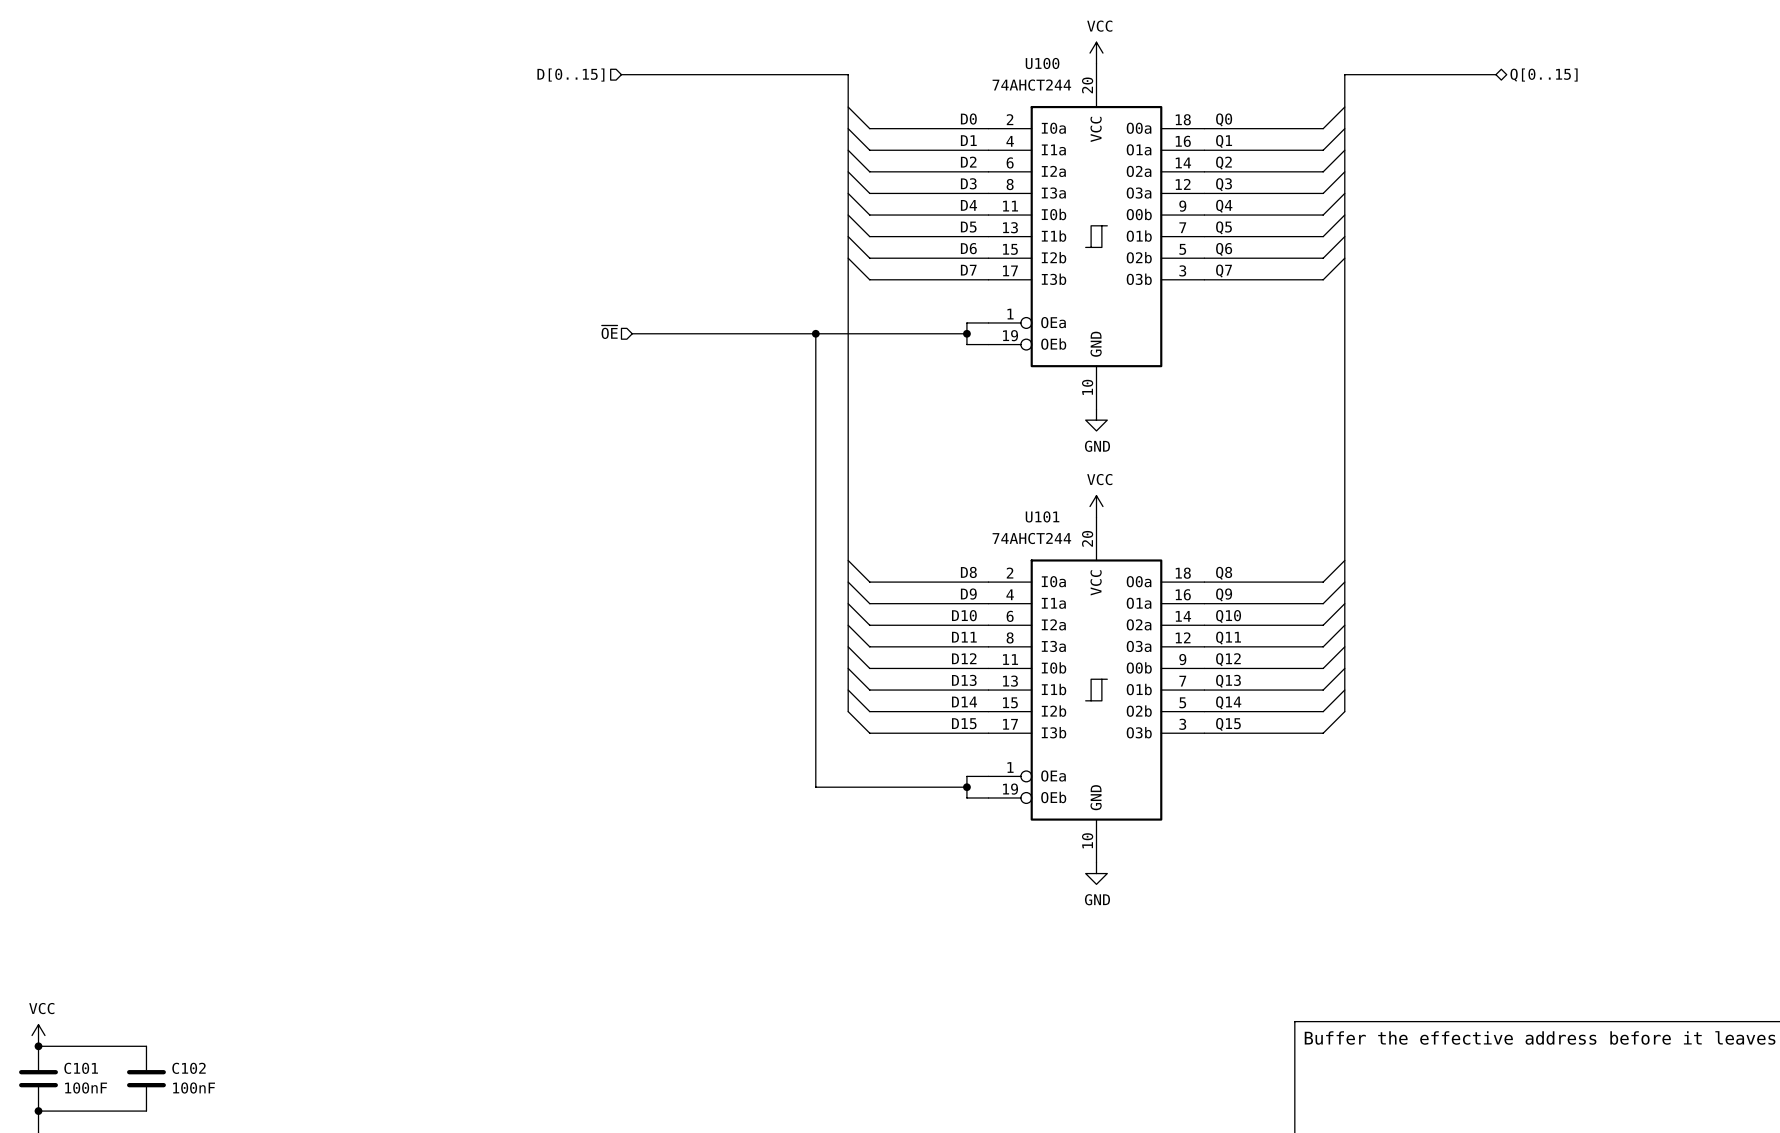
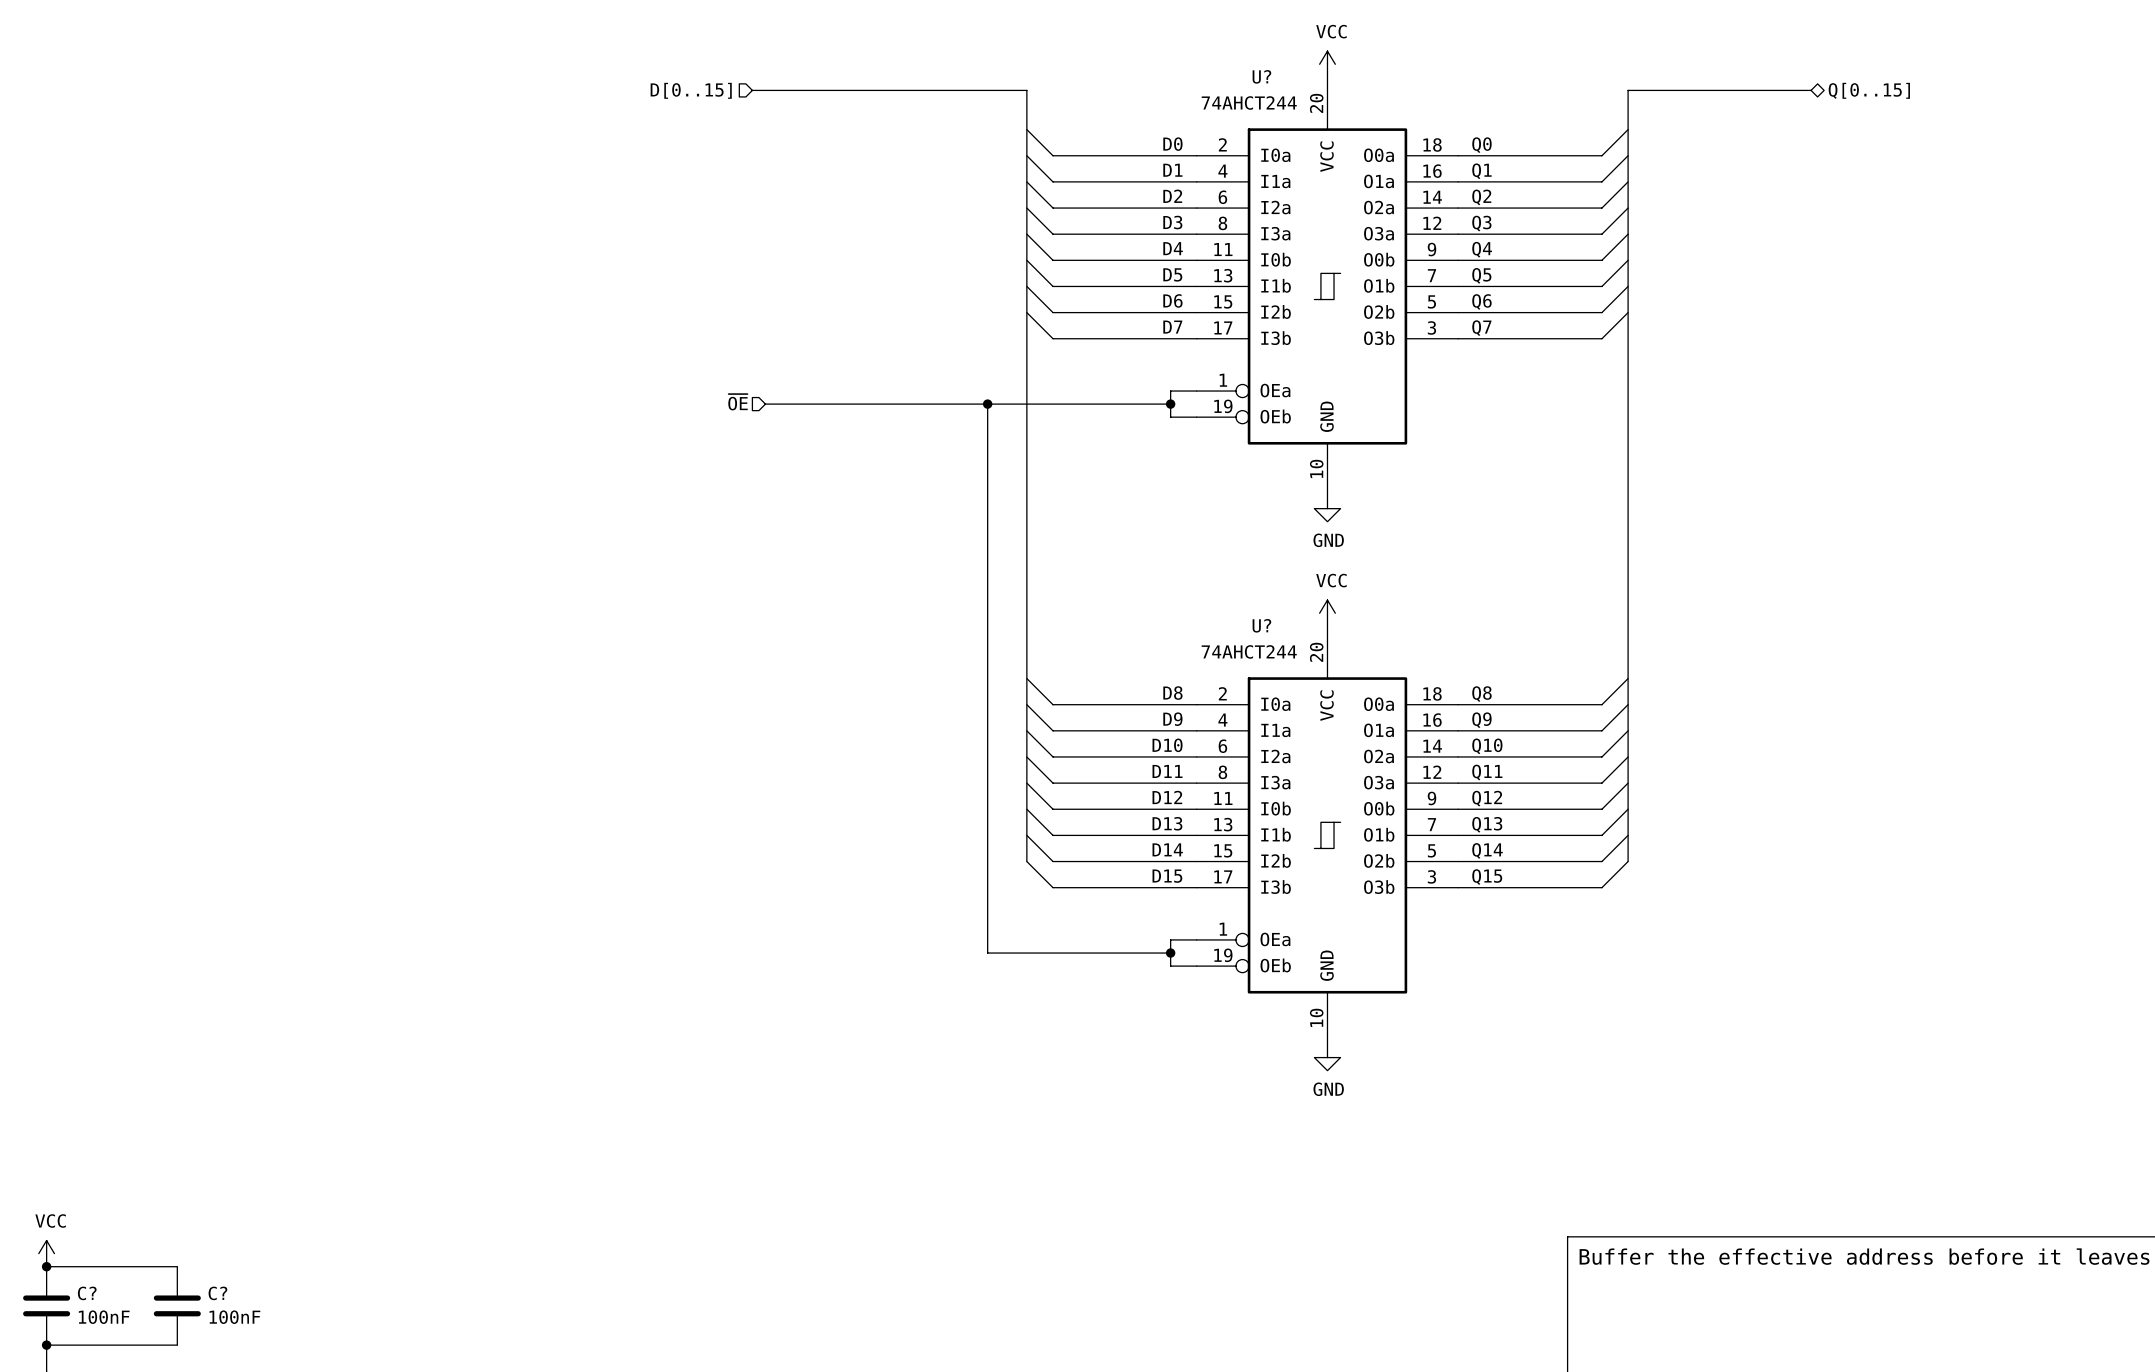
U100 name: U100 (1042, 63) -> U? (1261, 76)
U101 name: U101 (1042, 516) -> U? (1261, 625)
C101 name: C101 (81, 1068) -> C? (87, 1293)
C102 name: C102 (189, 1068) -> C? (217, 1293)

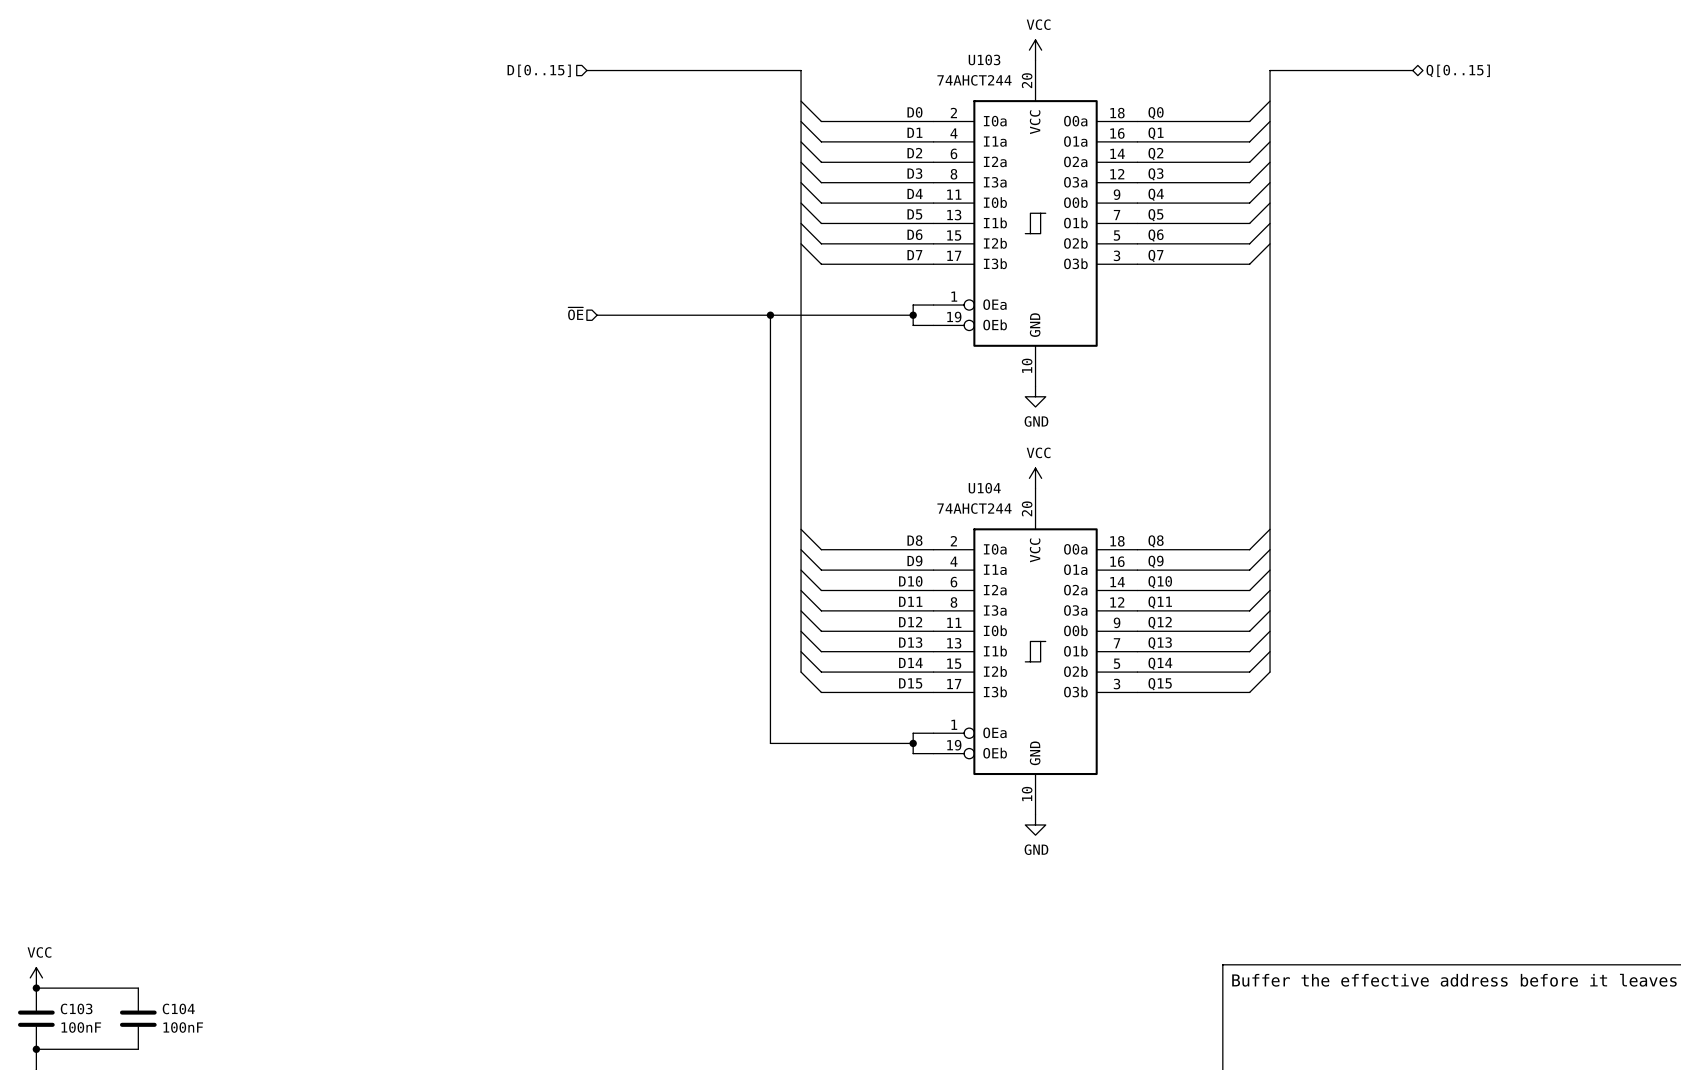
U? name: U? (1261, 76) -> U103 (984, 59)
U? name: U? (1261, 625) -> U104 (984, 488)
C? name: C? (87, 1293) -> C103 (76, 1008)
C? name: C? (217, 1293) -> C104 (178, 1008)

